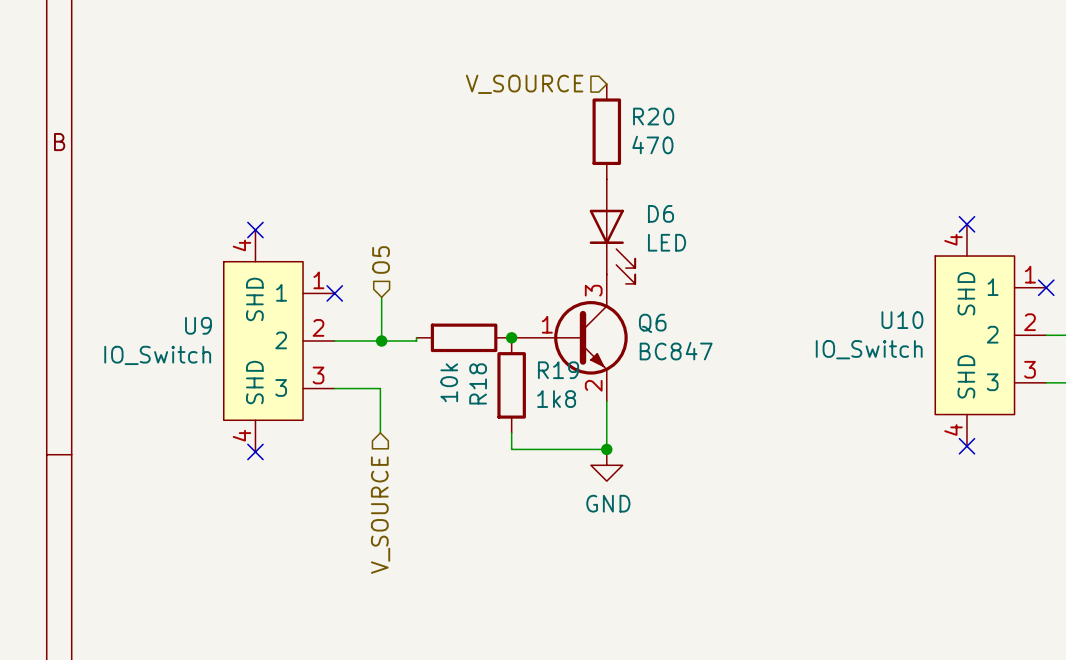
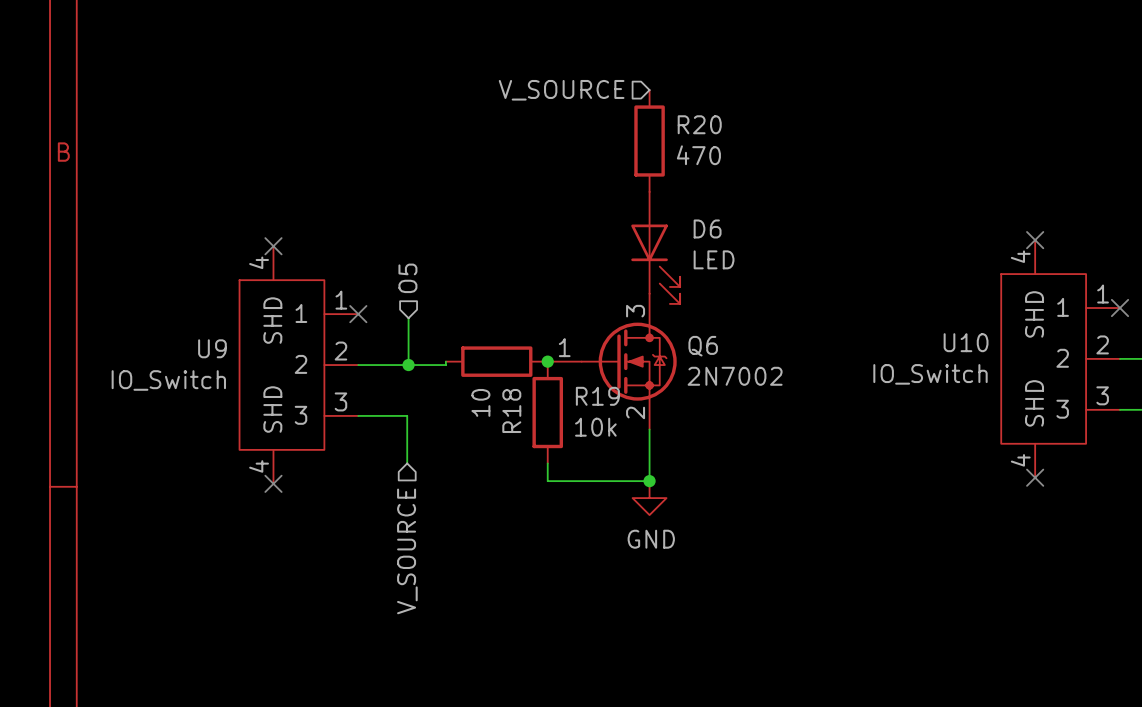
Q6 symbol: [511, 274, 628, 402] -> [547, 293, 677, 430]
Q6 value: BC847 (676, 351) -> 2N7002 (735, 376)
R18 value: 10k (449, 382) -> 10 (480, 402)
R19 value: 1k8 (556, 399) -> 10k (595, 427)

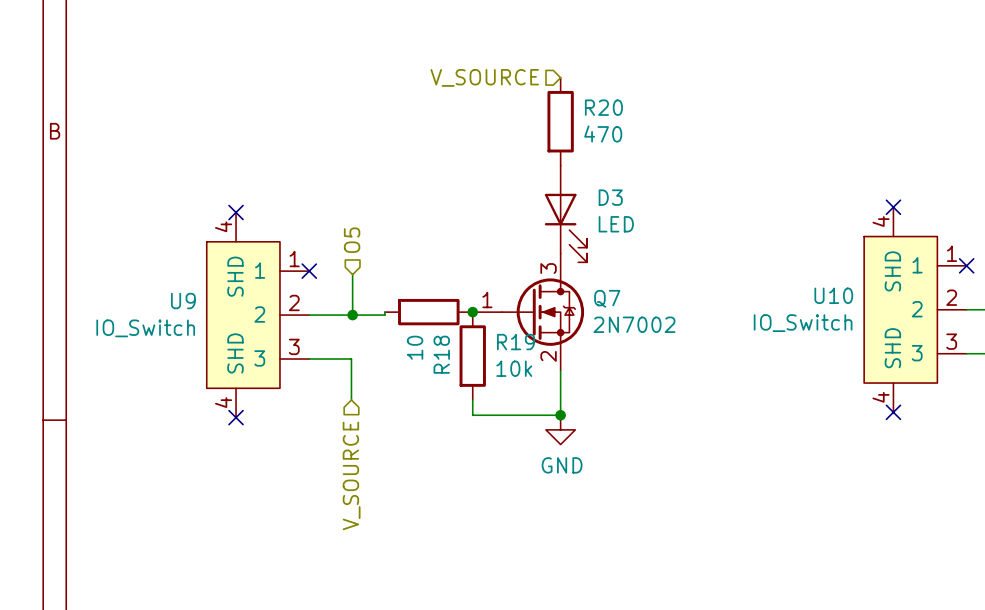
D6 name: D6 (707, 228) -> D3 (610, 197)
Q6 name: Q6 (703, 346) -> Q7 (607, 298)

